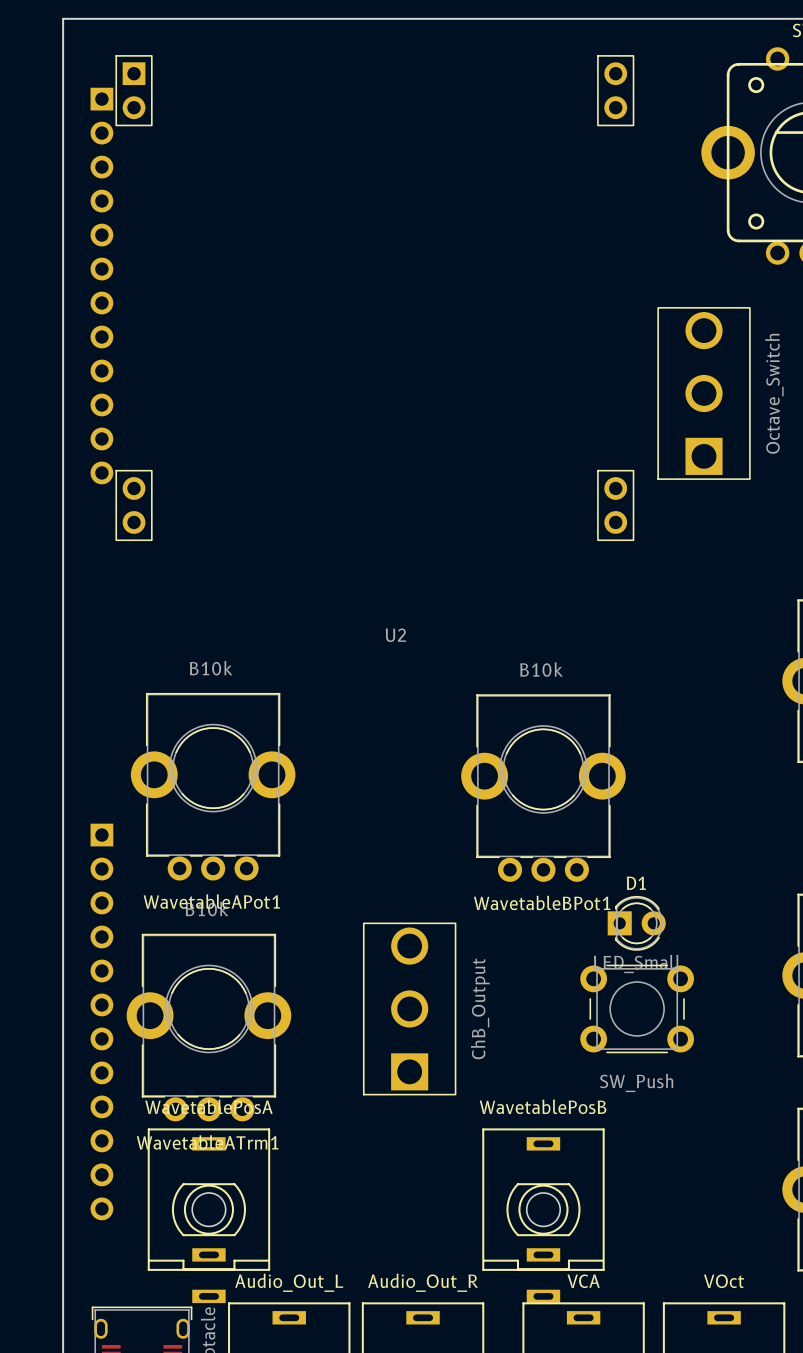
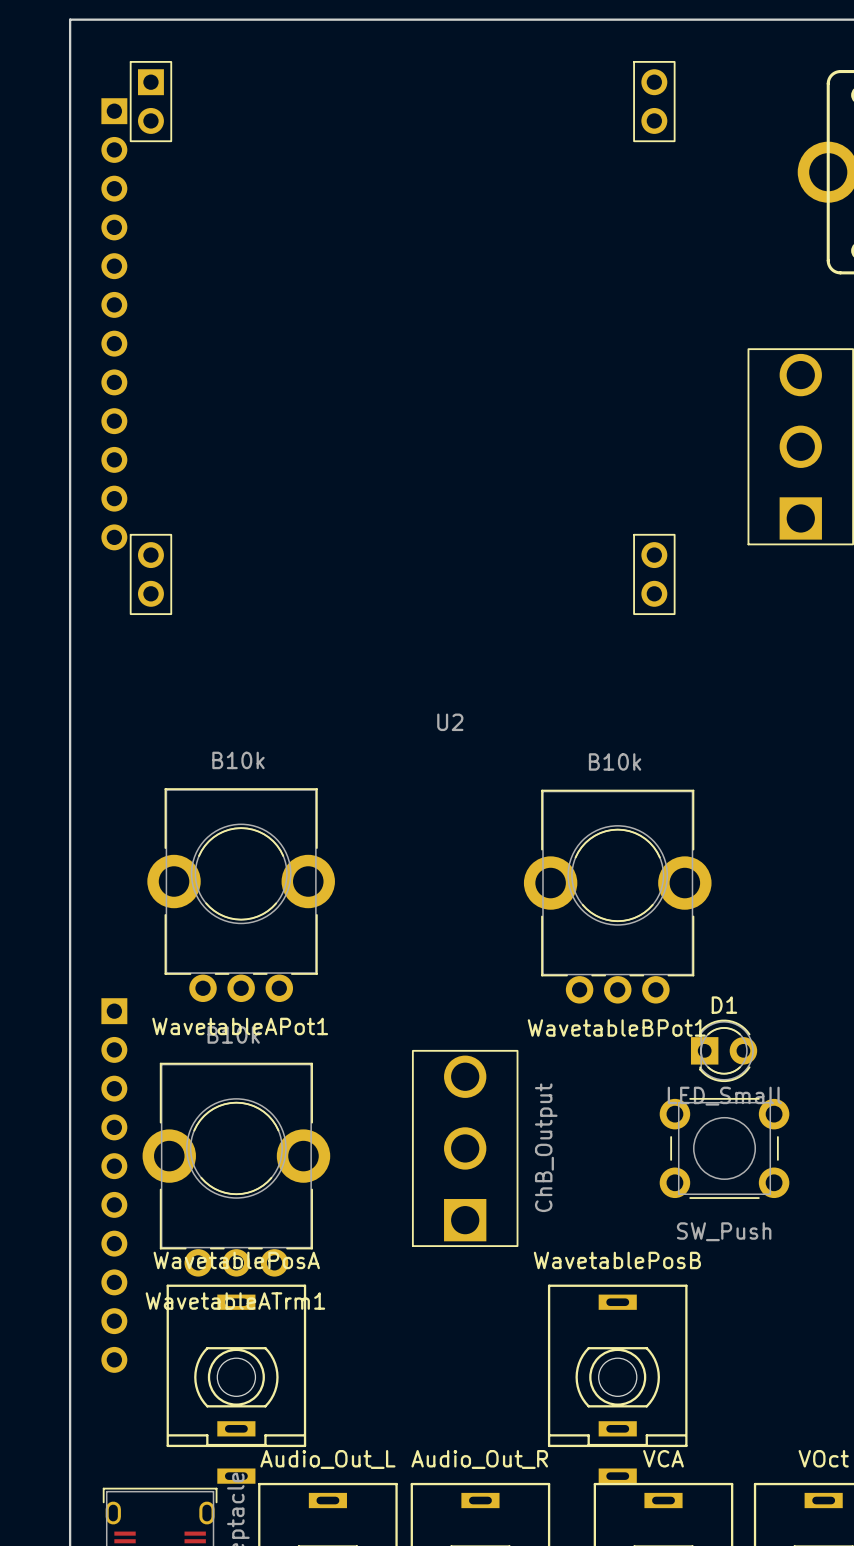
U2 footprint: [115, 55, 635, 542] -> [129, 60, 676, 616]
part: (101, 1021) -> none
part: none -> (114, 1185)

